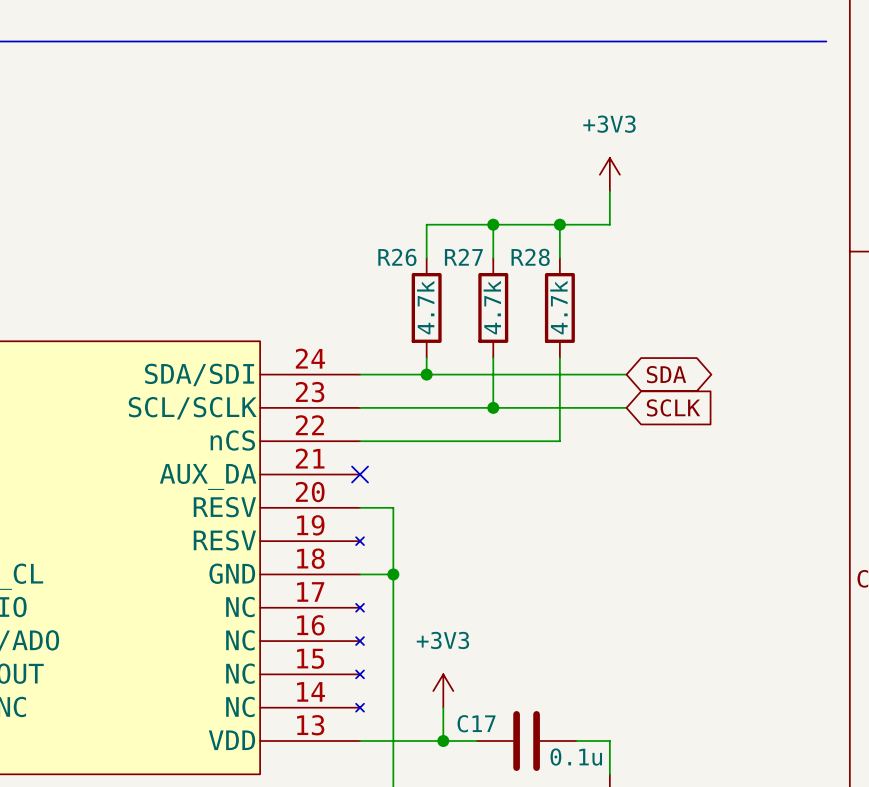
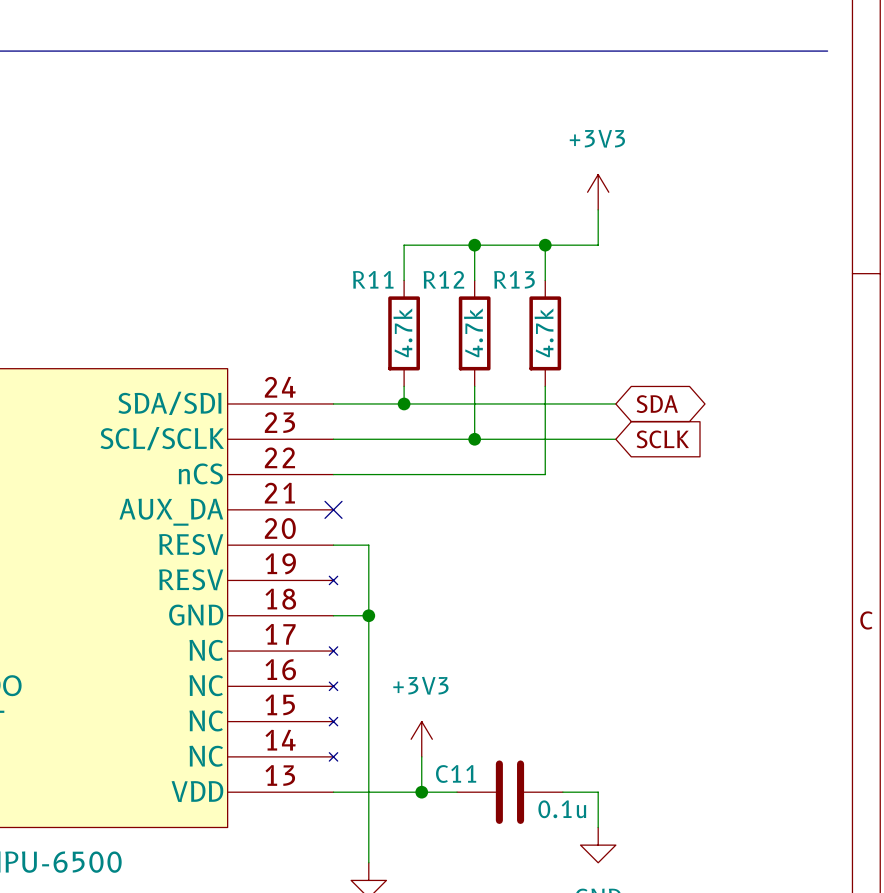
R26 name: R26 (397, 257) -> R11 (373, 279)
R27 name: R27 (463, 257) -> R12 (443, 279)
R28 name: R28 (530, 257) -> R13 (514, 279)
C17 name: C17 (476, 723) -> C11 (456, 773)

